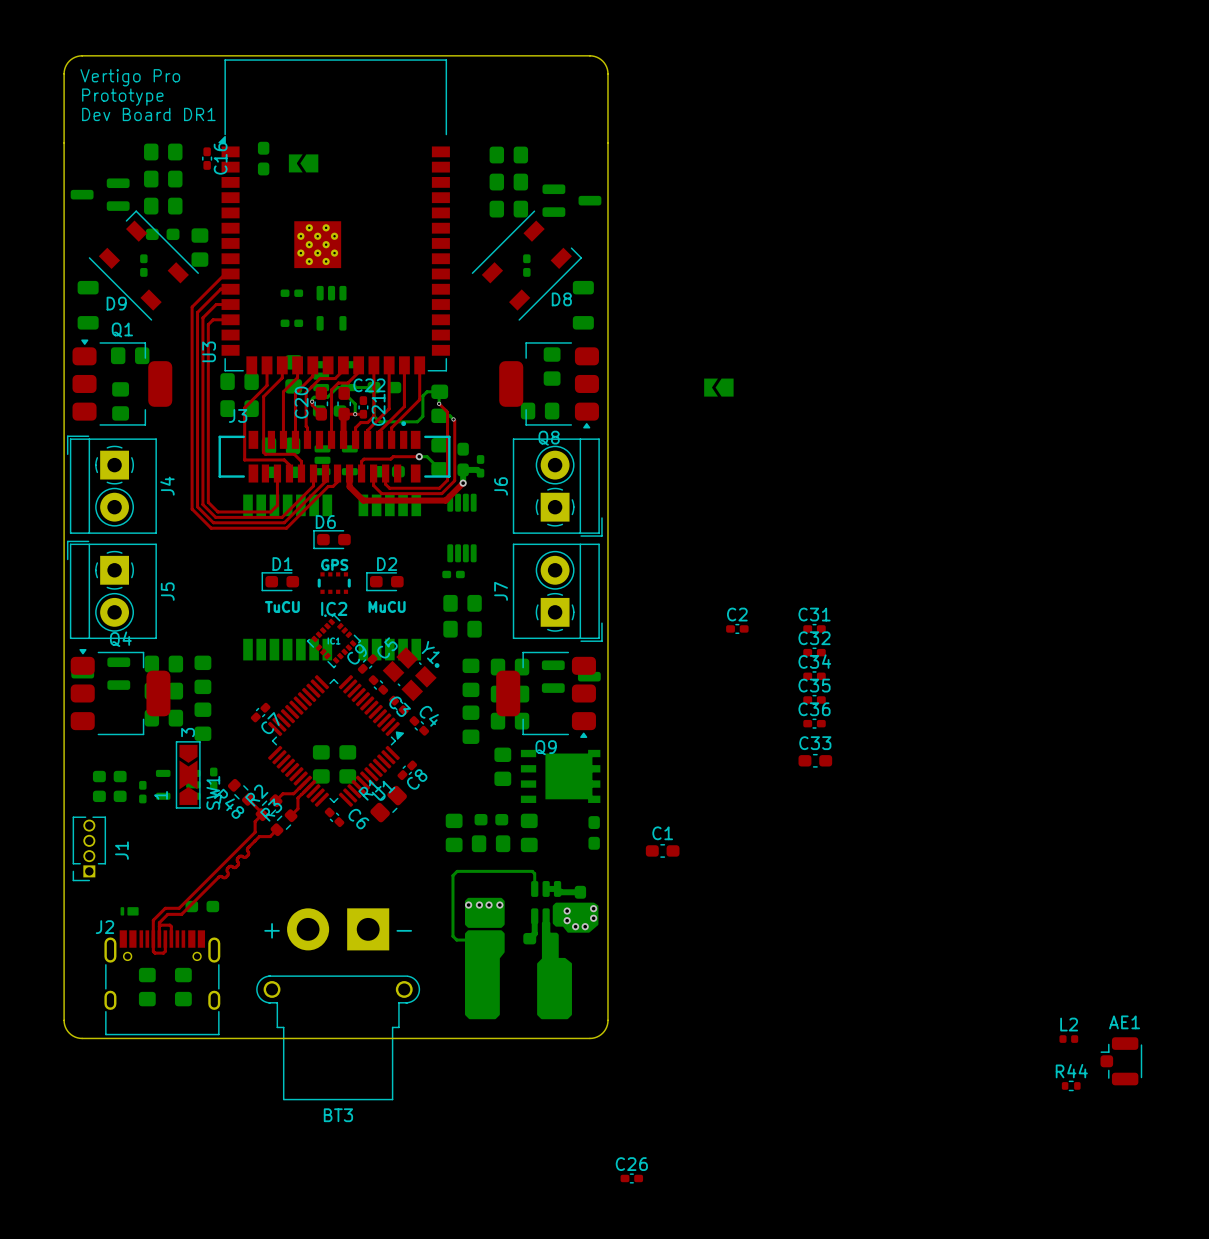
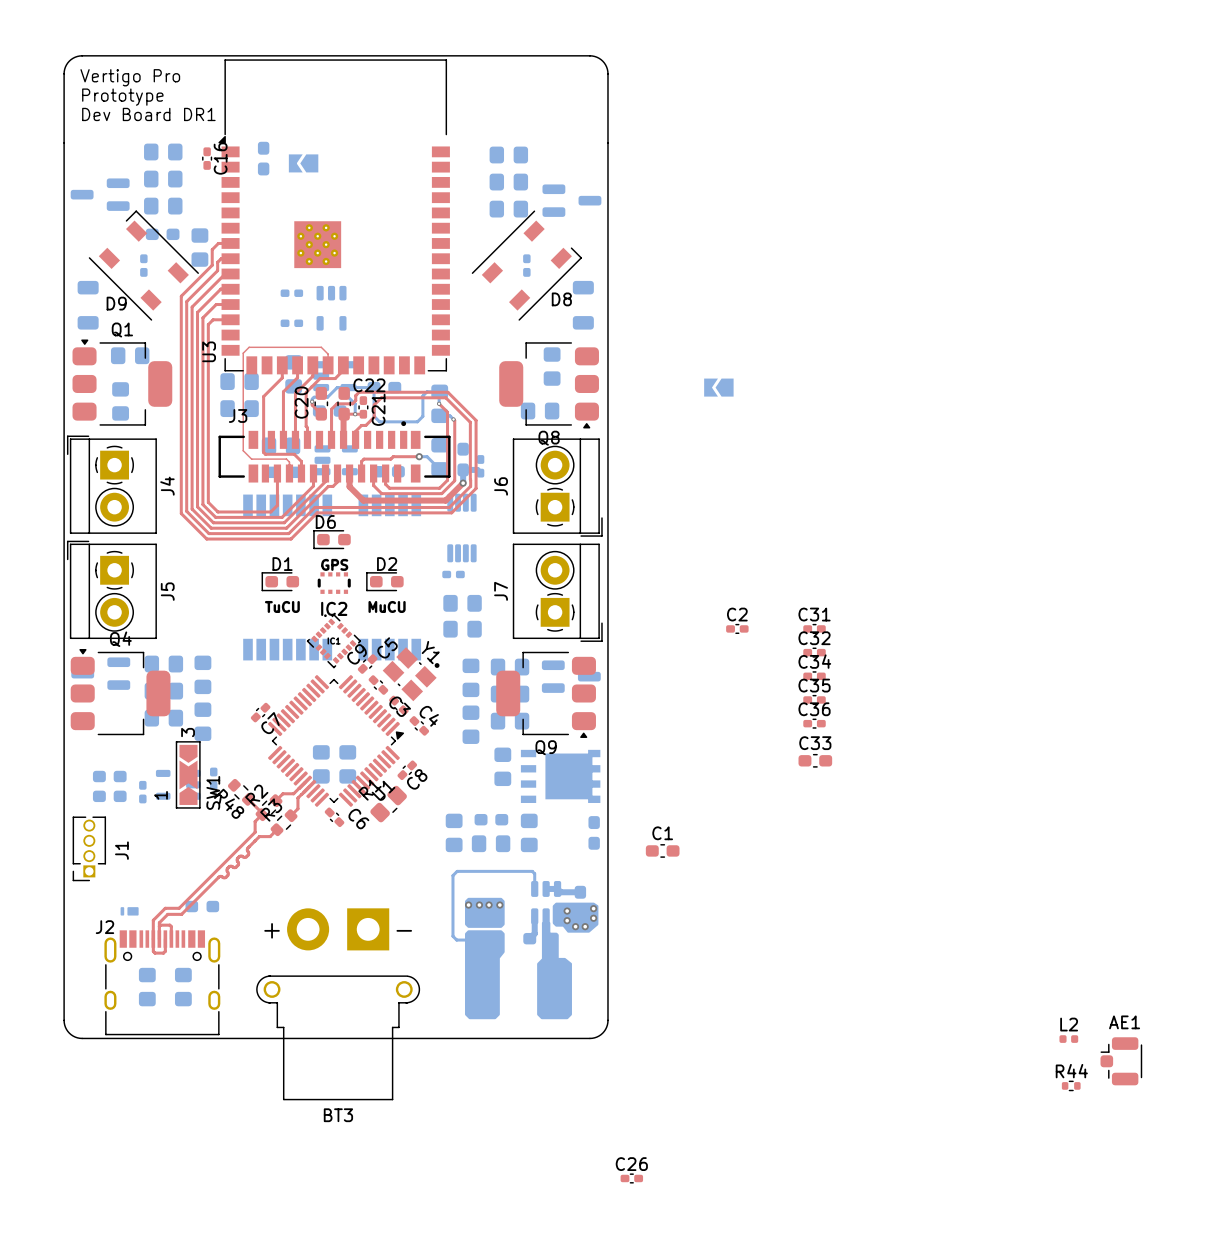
top track: (267, 365) (267, 385) (244, 407) (244, 459) (284, 459) (289, 465) -> (328, 365) (328, 354) (321, 347) (249, 347) (243, 353) (243, 450) (251, 459) (286, 459) (289, 465)
top track: (358, 365) (358, 372) (347, 383) (338, 383) (331, 389) (331, 409) -> (230, 243) (218, 243) (212, 249) (212, 265) (181, 296) (181, 513) (206, 539) (291, 539) (317, 512) (451, 512) (476, 488) (476, 420) (447, 392) (359, 392) (352, 403) (336, 403) (331, 409)
top track: (373, 365) (373, 416) (367, 422) (360, 422) (355, 427) (355, 431) -> (230, 258) (221, 258) (217, 262) (217, 270) (186, 301) (186, 511) (208, 533) (288, 533) (314, 507) (449, 507) (470, 486) (470, 422) (445, 397) (381, 397) (374, 405) (374, 417) (365, 425) (361, 425) (355, 431)
top track: (389, 365) (389, 408) (367, 430) (367, 439) -> none
top track: (404, 365) (404, 406) (379, 431) (379, 439) -> none
top track: (419, 365) (419, 399) (391, 427) (391, 439) -> none

